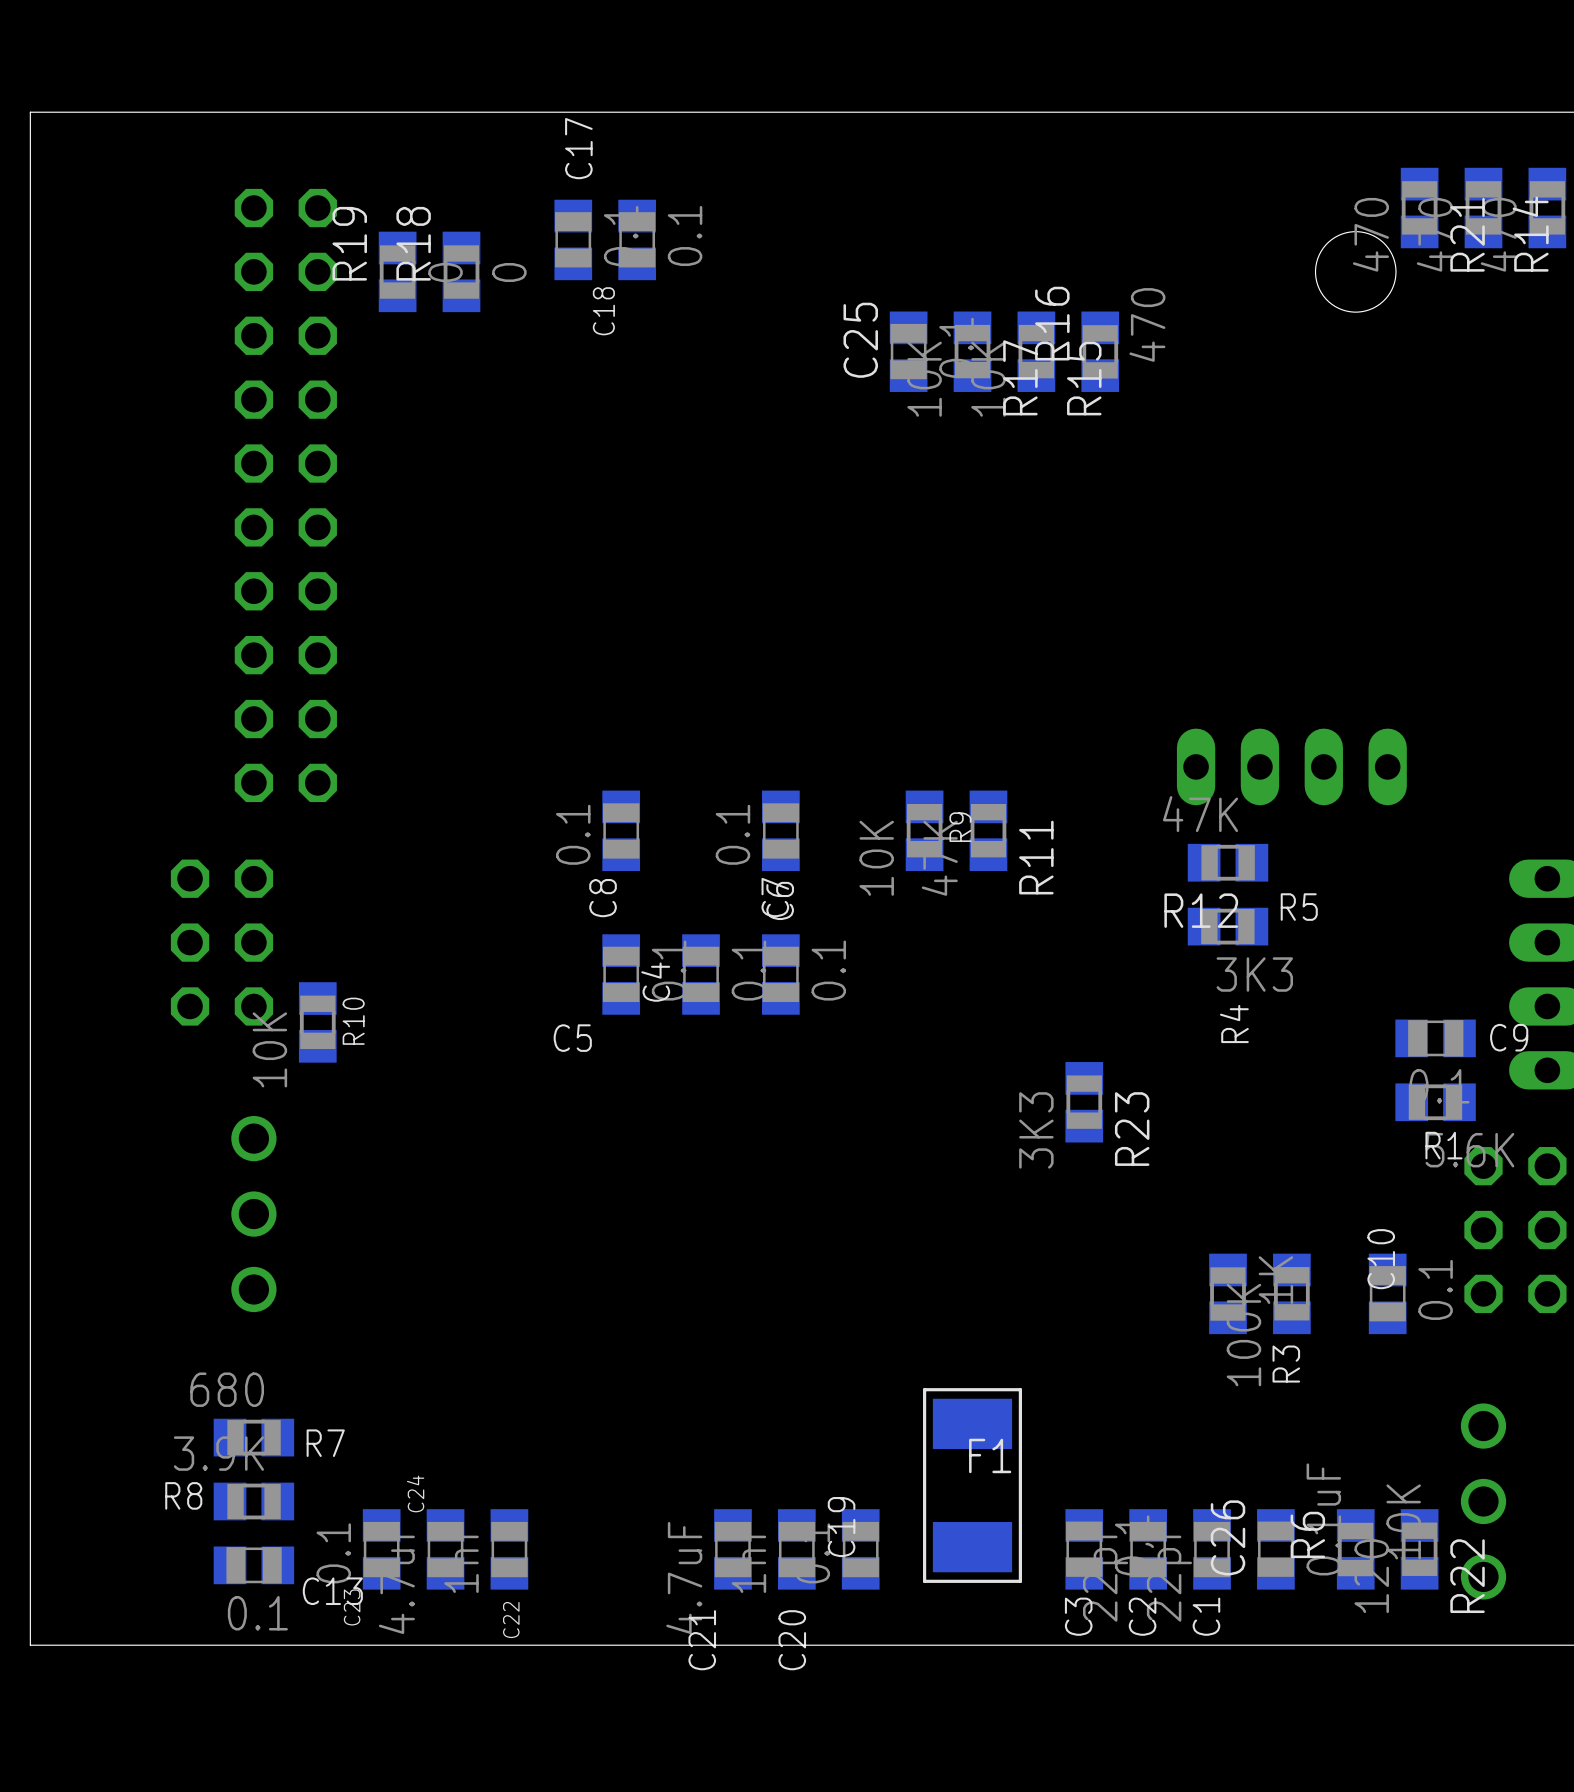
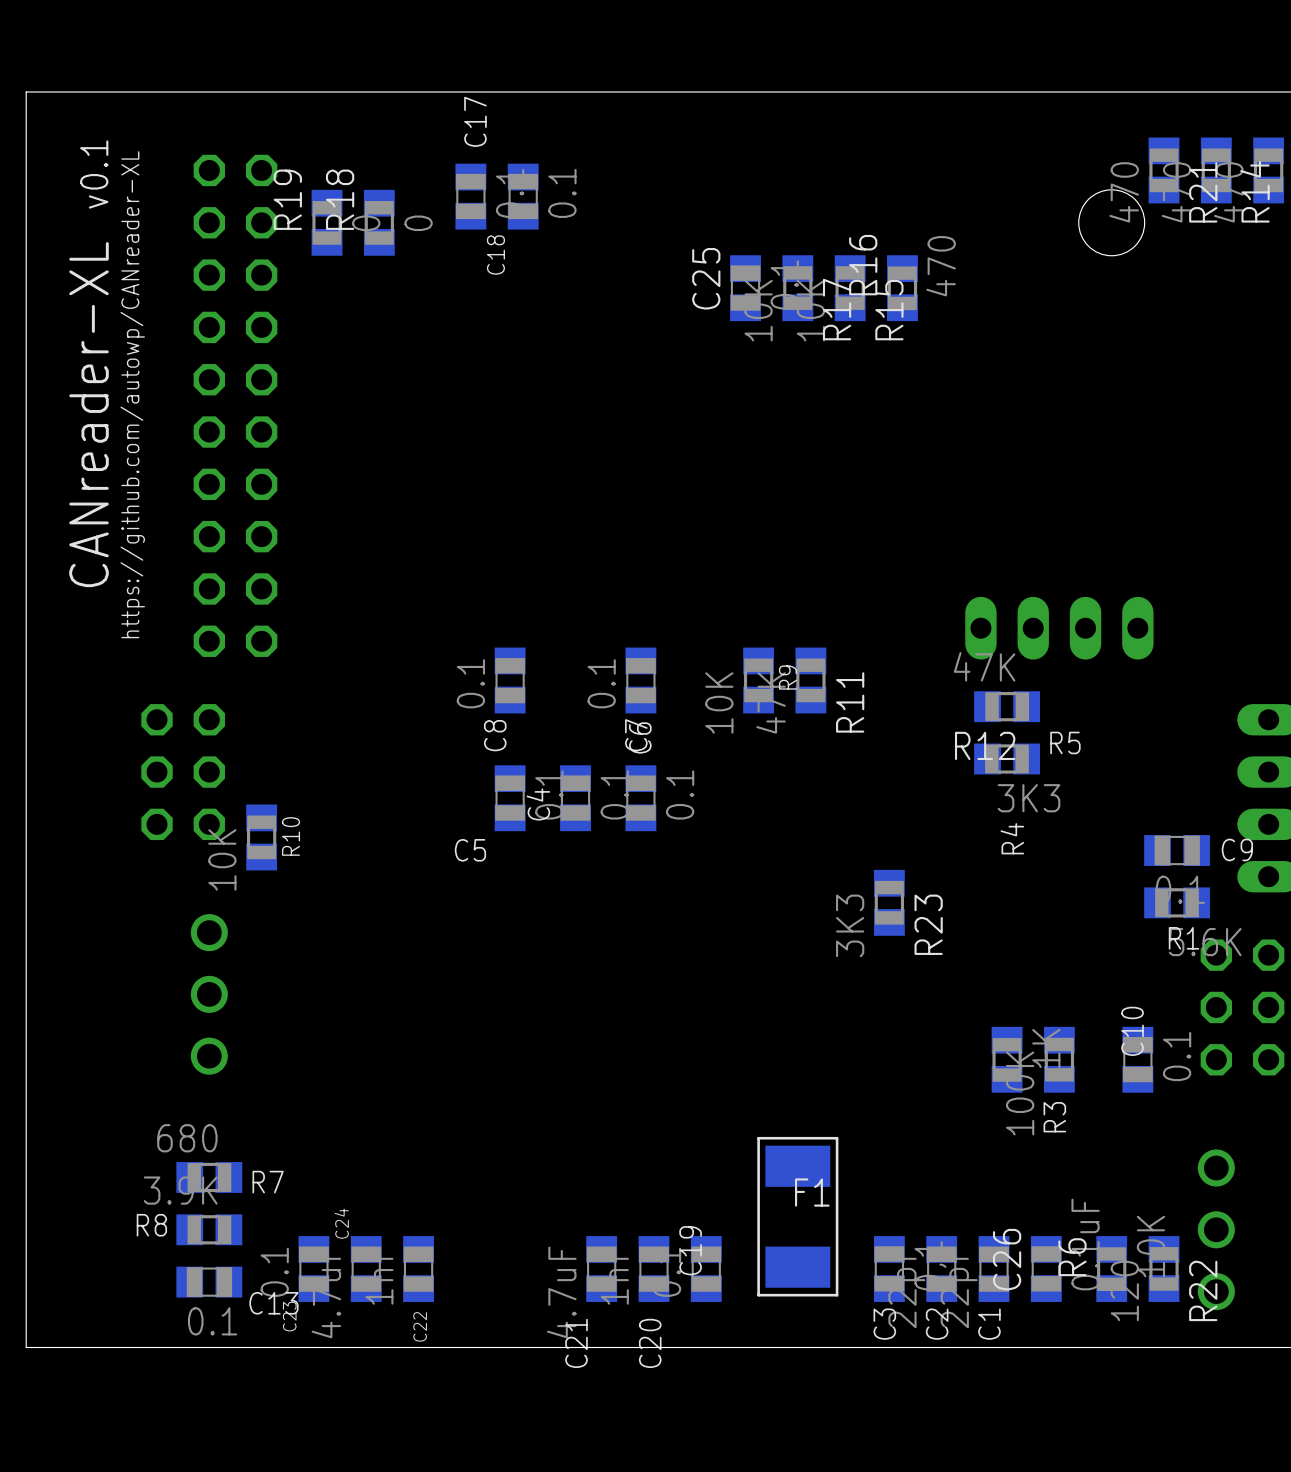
text: none -> v0.1 (94, 174)
text: none -> https://github.com/autowp/CANreader-XL (132, 394)
text: none -> CANreader-XL (89, 414)

